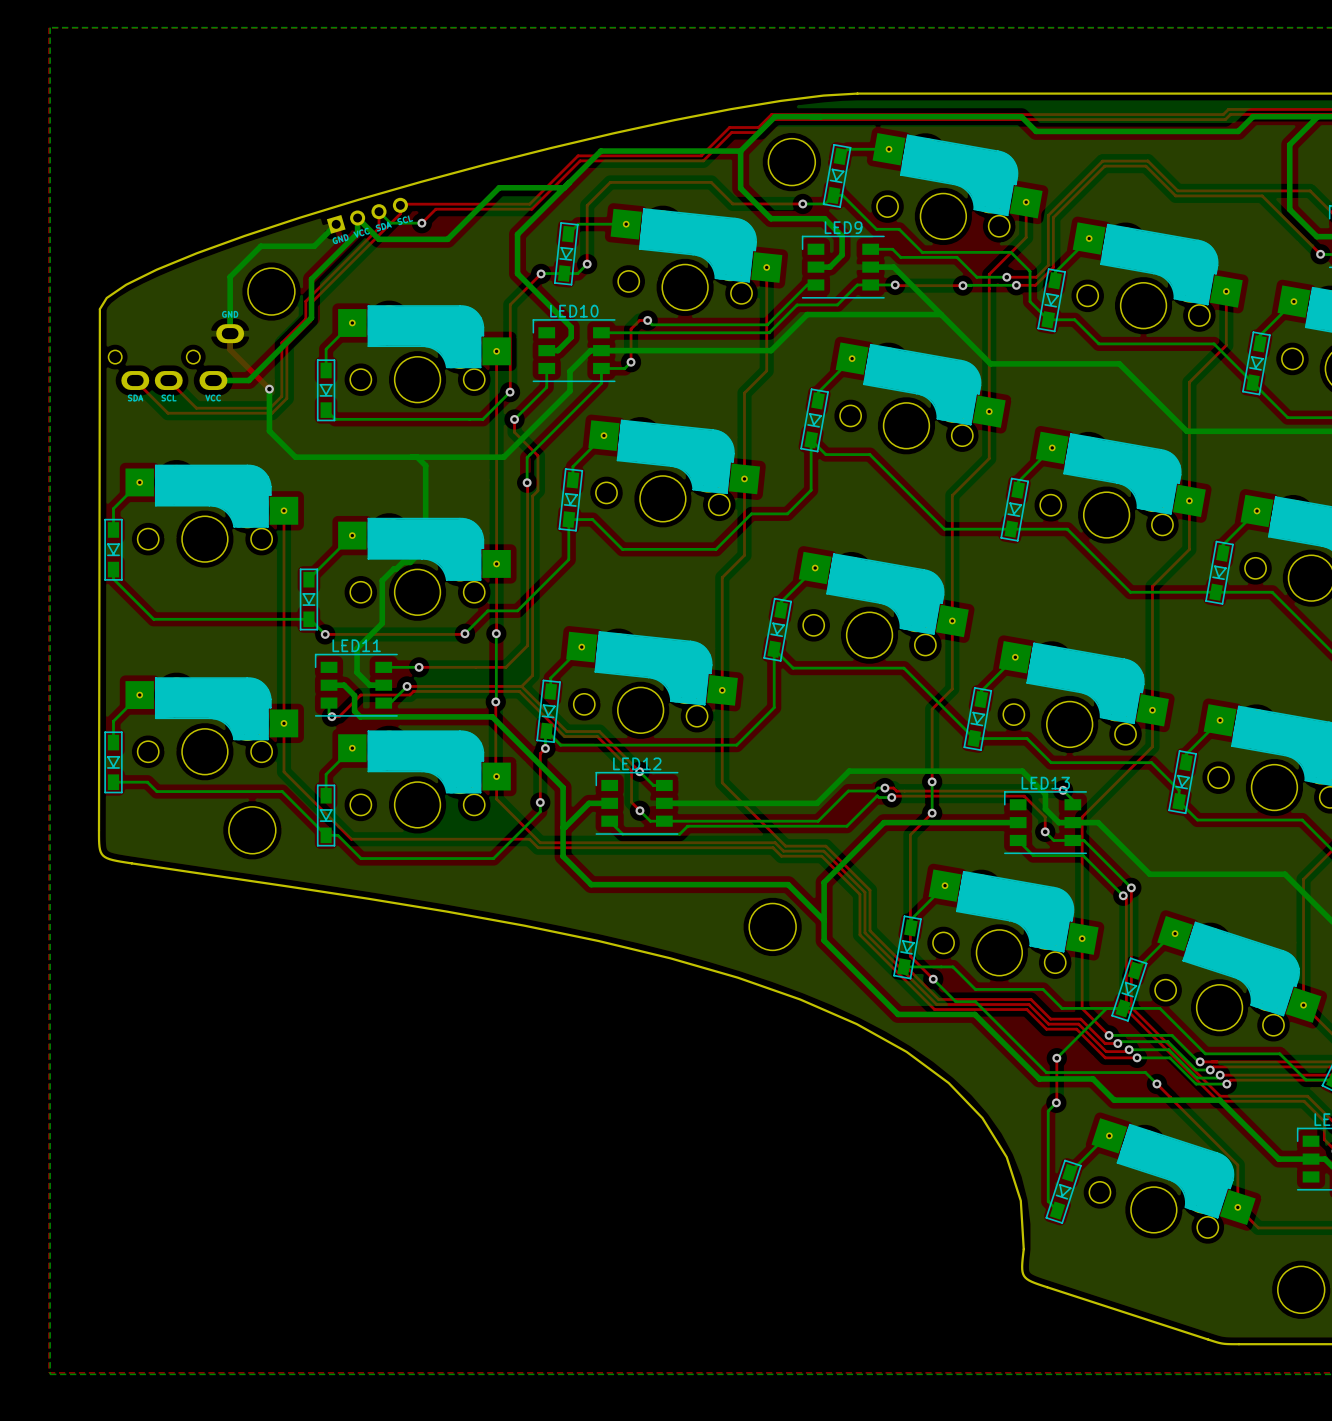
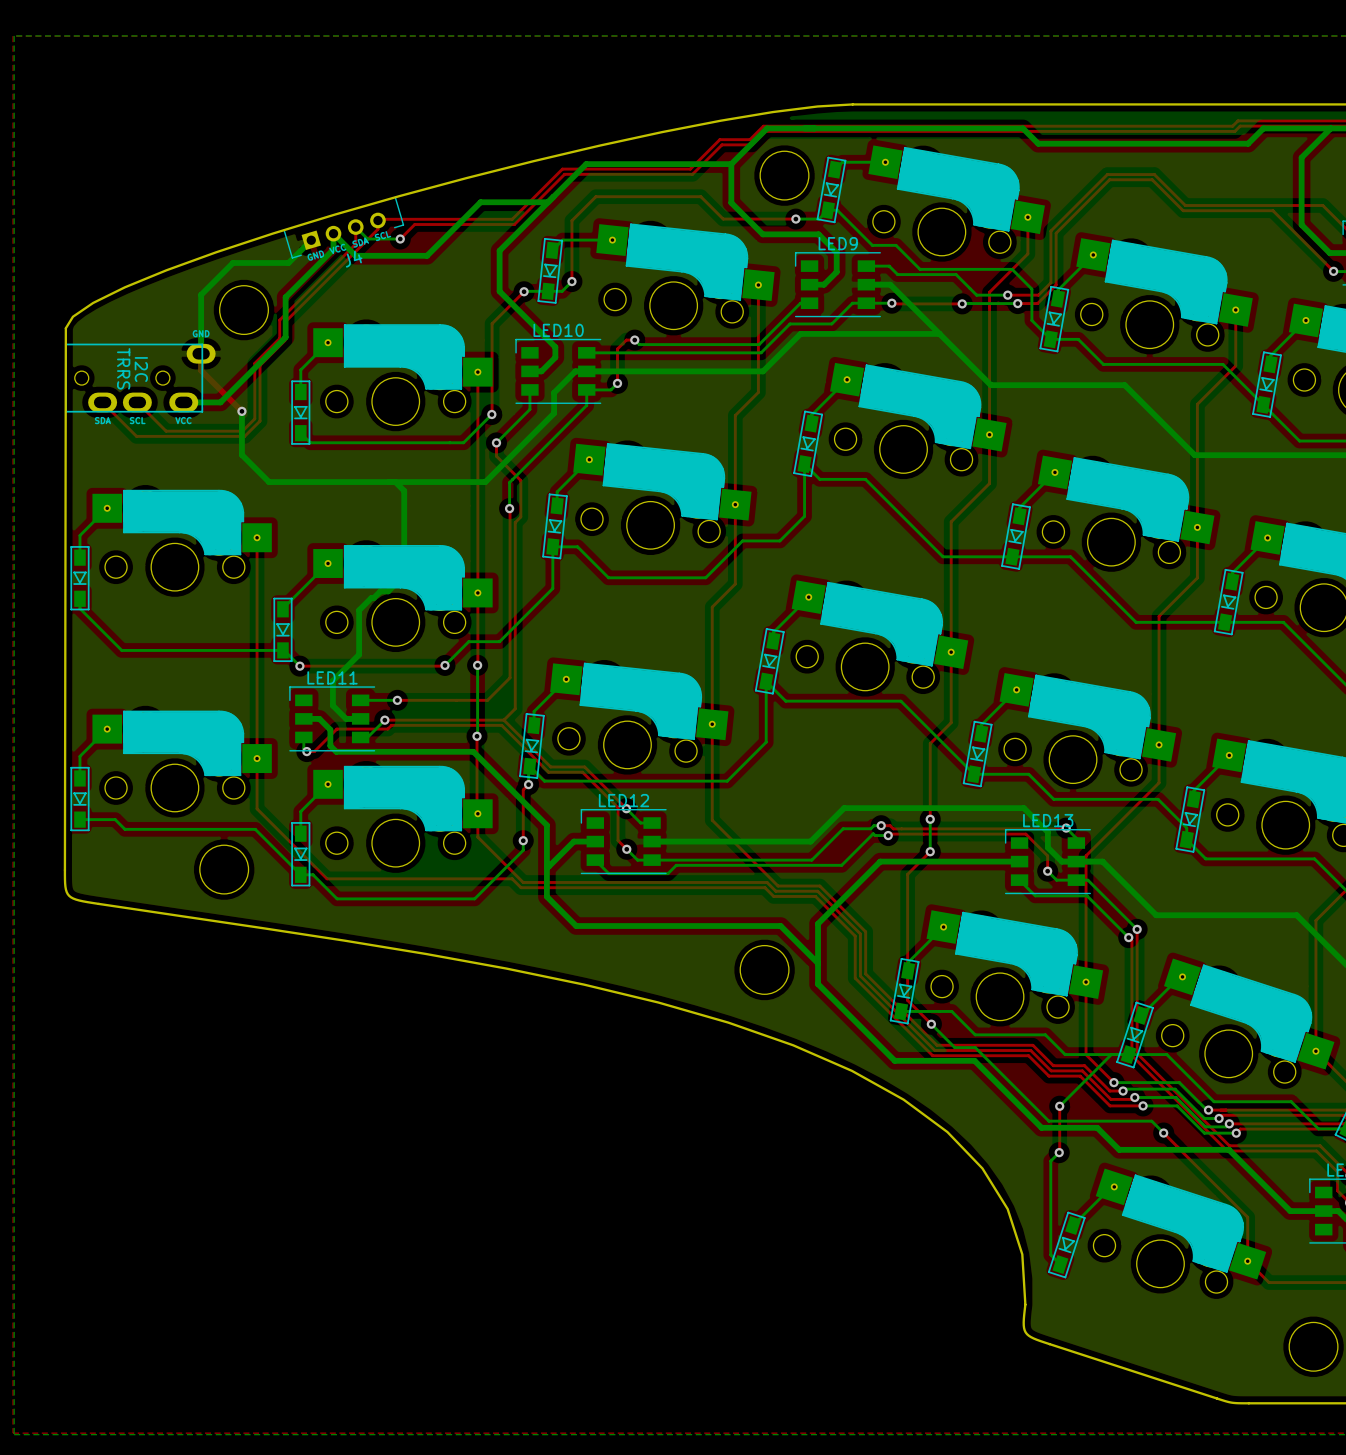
J4: none -> (343, 227)
part footprint: [108, 324, 245, 391] -> [65, 343, 216, 413]

